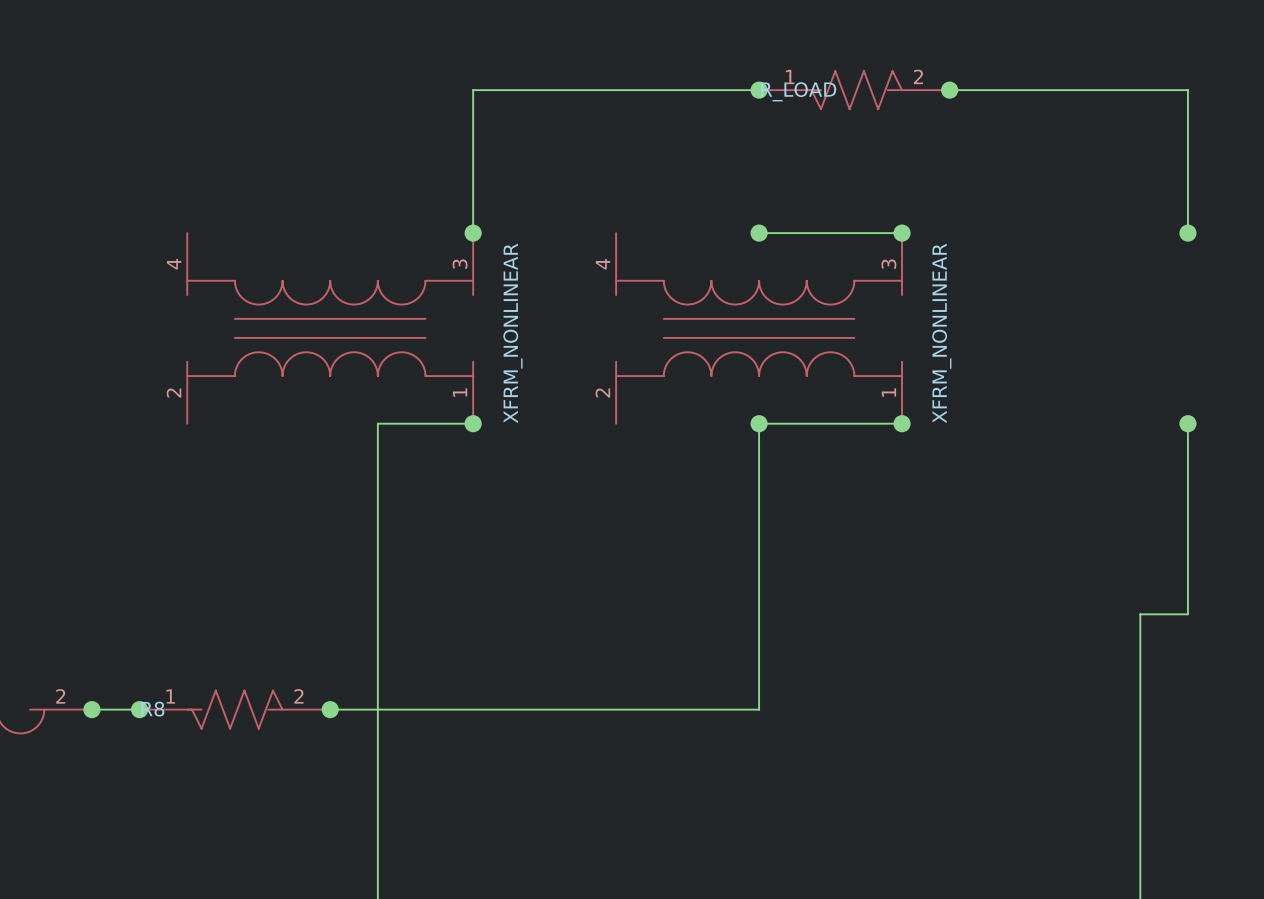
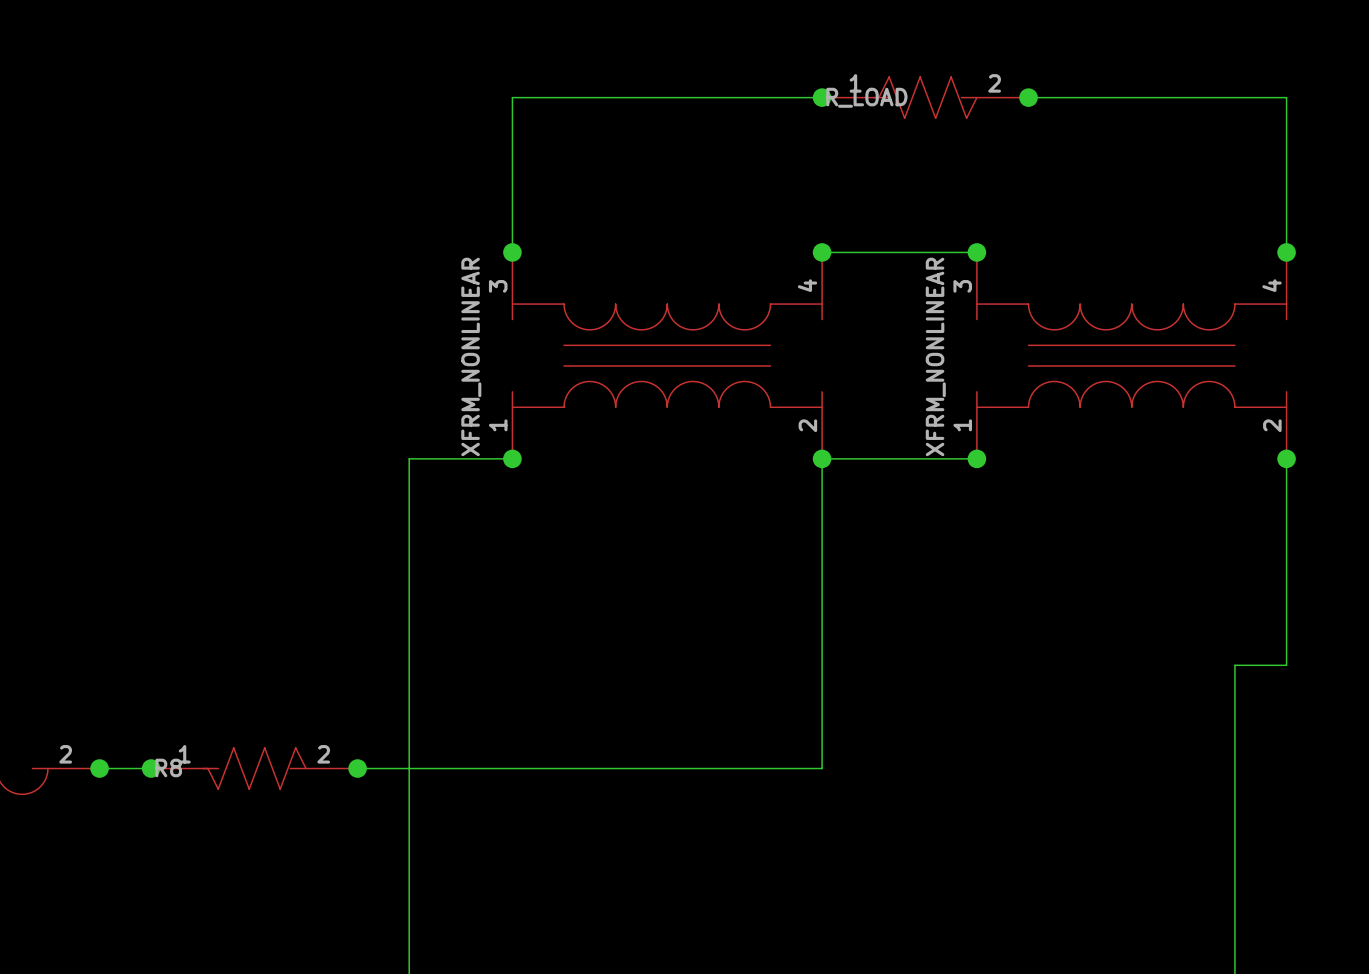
R_LOAD flip: as is (854, 90) -> up-down (925, 97)
part: XFRM_NONLINEAR (330, 328) -> none
part: none -> XFRM_NONLINEAR (667, 355)
part: XFRM_NONLINEAR (759, 328) -> none
part: none -> XFRM_NONLINEAR (1131, 355)

